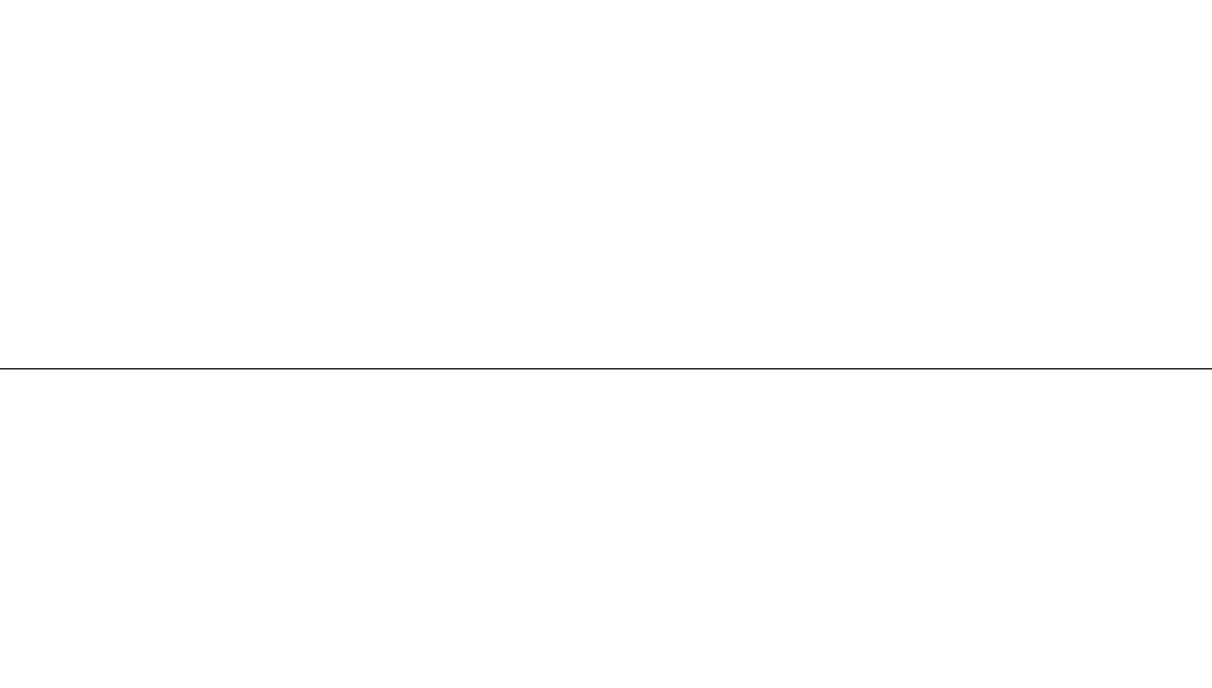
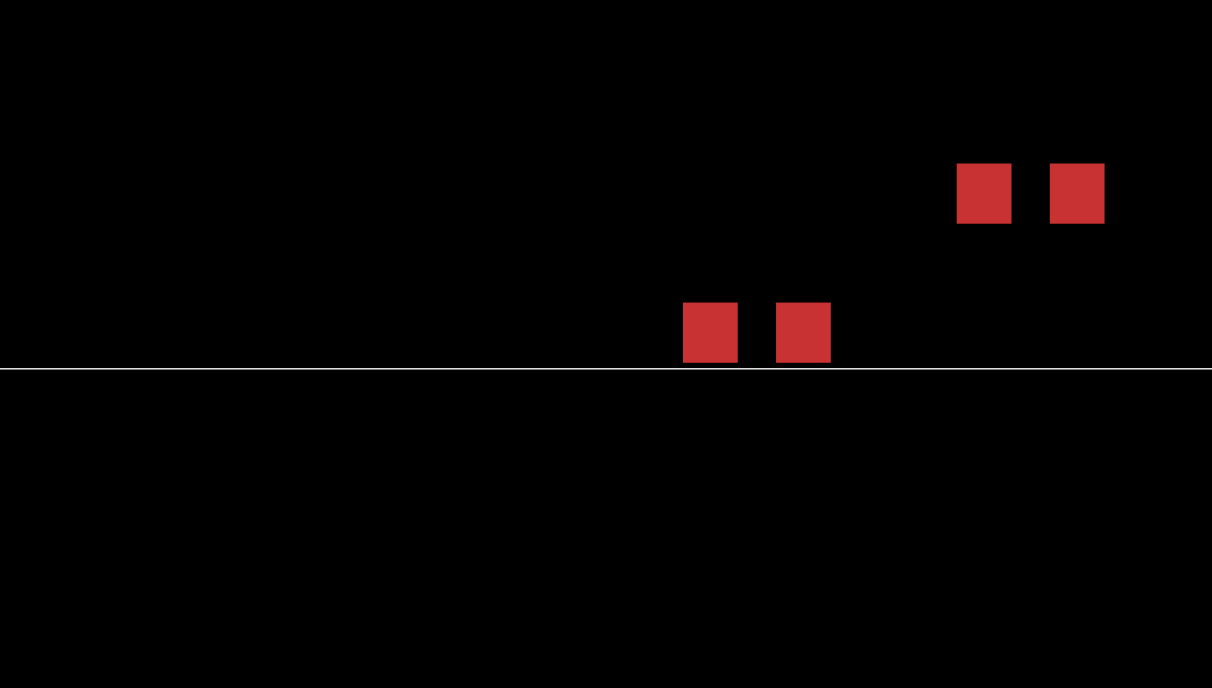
part: none -> (1030, 193)
part: none -> (756, 332)

